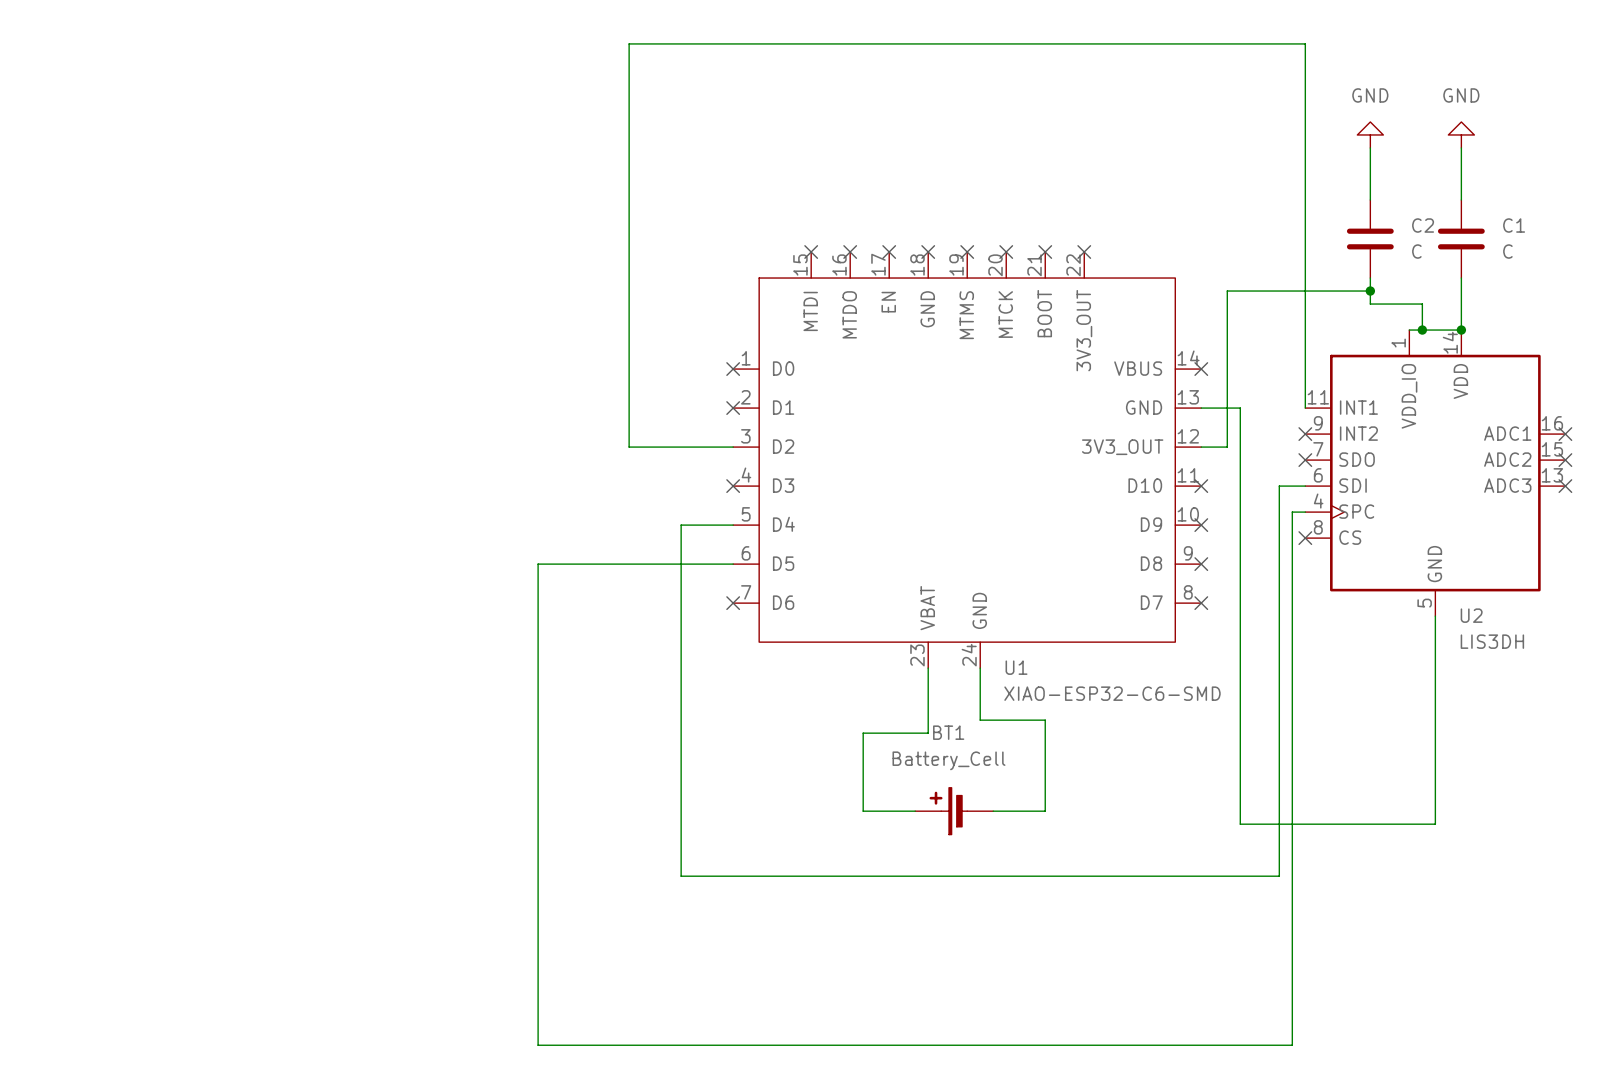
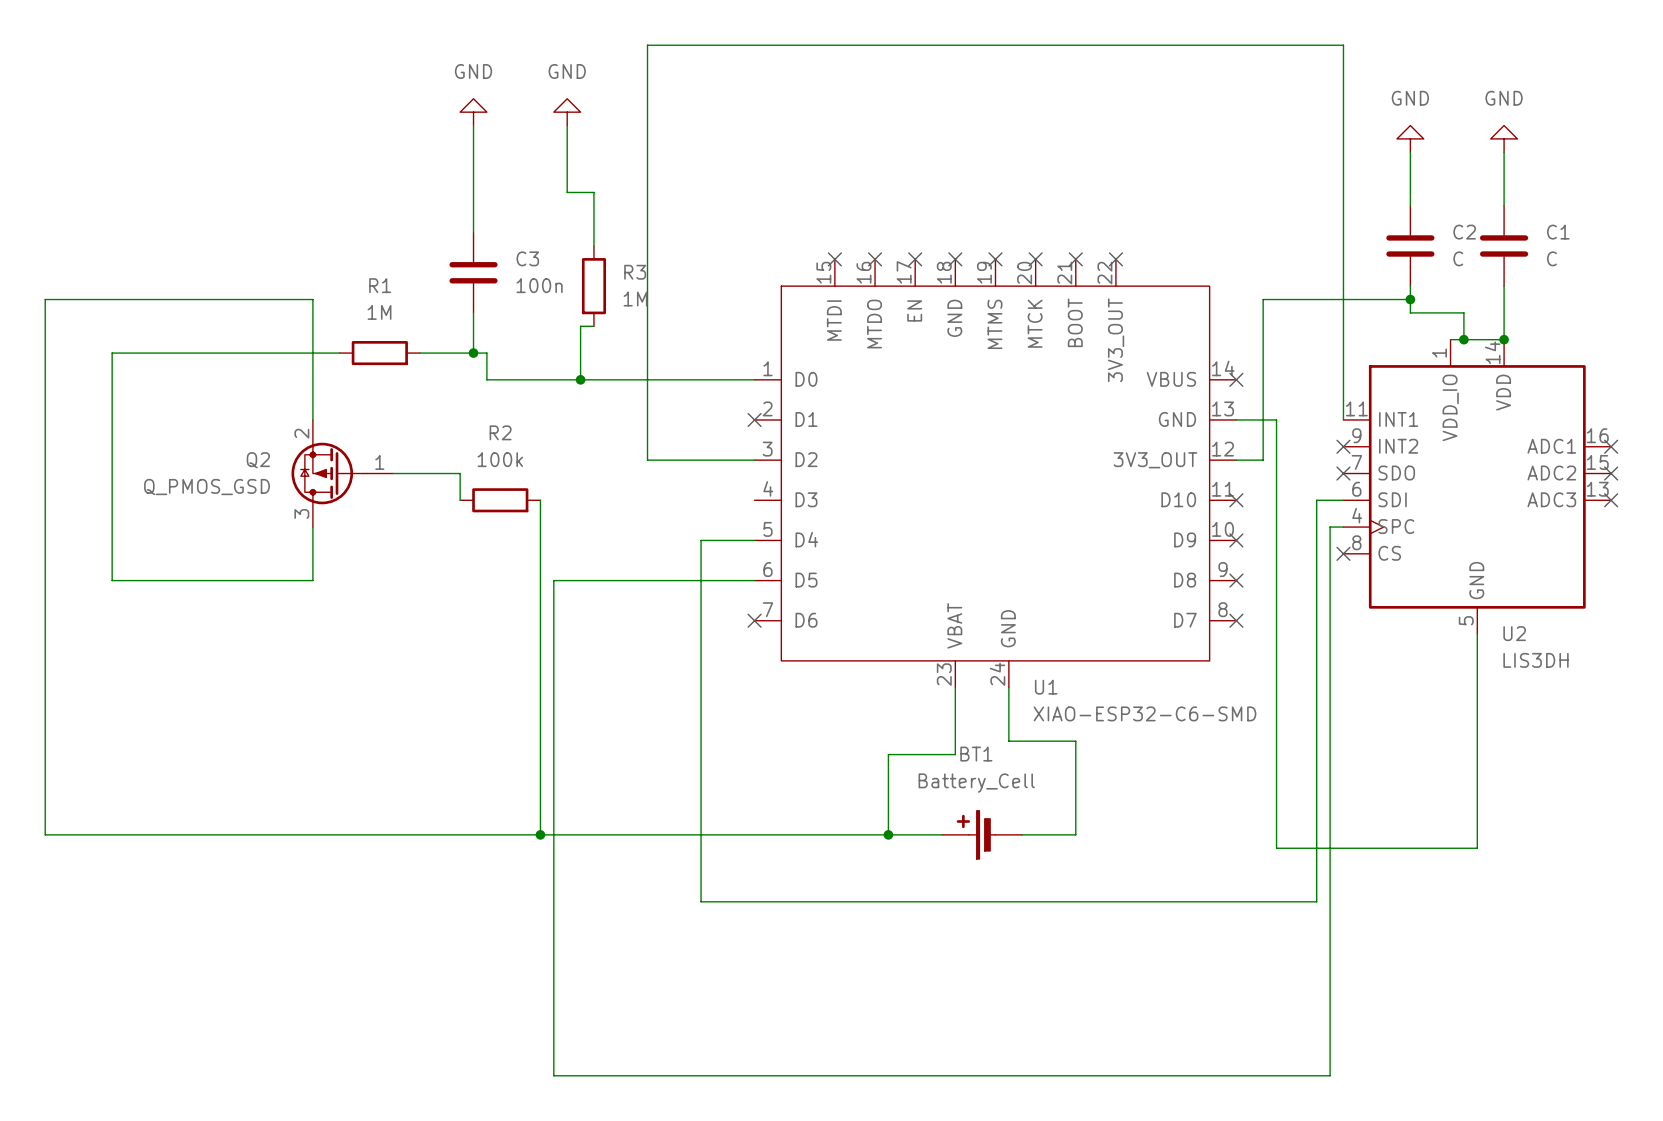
power symbol: none -> GND (473, 112)
power symbol: none -> GND (567, 112)
wire: none -> (473, 125) (473, 232)
wire: none -> (567, 125) (567, 192) (593, 192) (593, 245)
C3: none -> 100n (473, 272)
R3: none -> 1M (593, 286)
wire: none -> (473, 312) (473, 353)
wire: none -> (593, 326) (580, 326) (580, 379)
wire: none -> (339, 353) (112, 353) (112, 580) (312, 580) (312, 527)
R1: none -> 1M (379, 353)
wire: none -> (419, 353) (486, 353) (486, 379) (754, 379)
junction: none -> (473, 353)
junction: none -> (580, 379)
no-connect mark: (733, 369) -> none
wire: none -> (312, 419) (312, 299) (45, 299) (45, 834) (888, 834)
Q2: none -> Q_PMOS_GSD (342, 473)
wire: none -> (393, 473) (460, 473) (460, 500)
R2: none -> 100k (500, 500)
wire: none -> (540, 500) (540, 834)
no-connect mark: (733, 486) -> none
junction: none -> (540, 834)
junction: none -> (888, 834)

